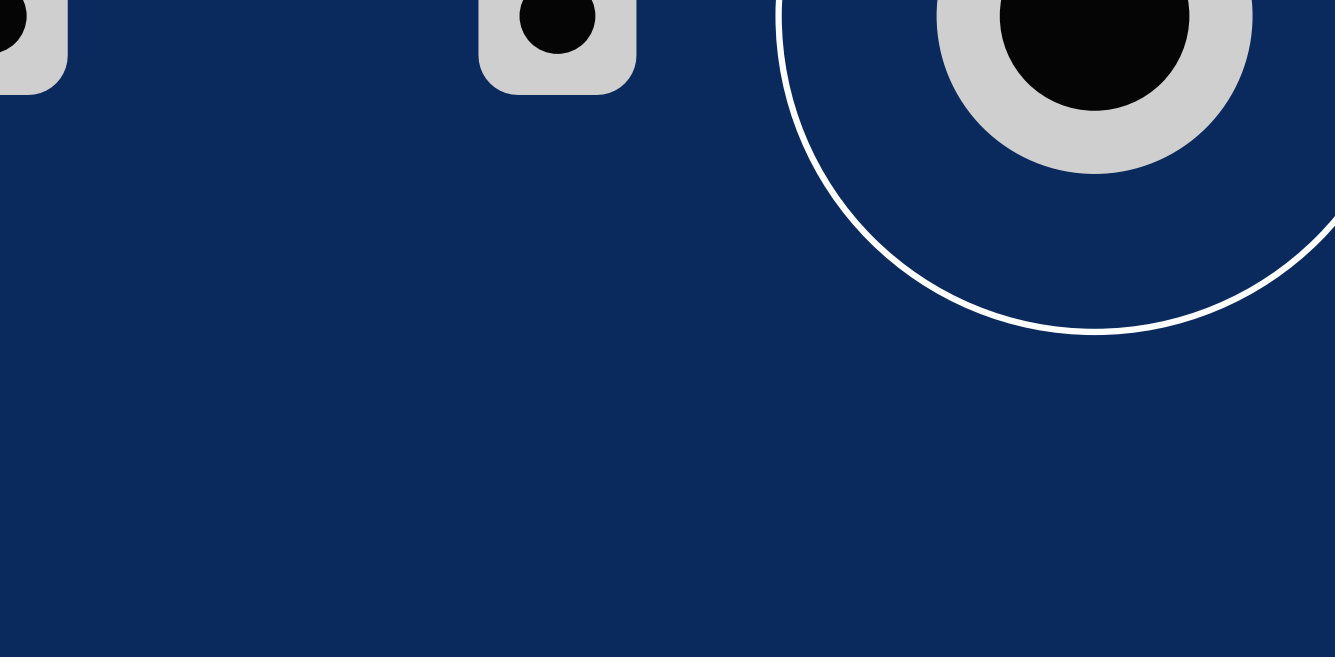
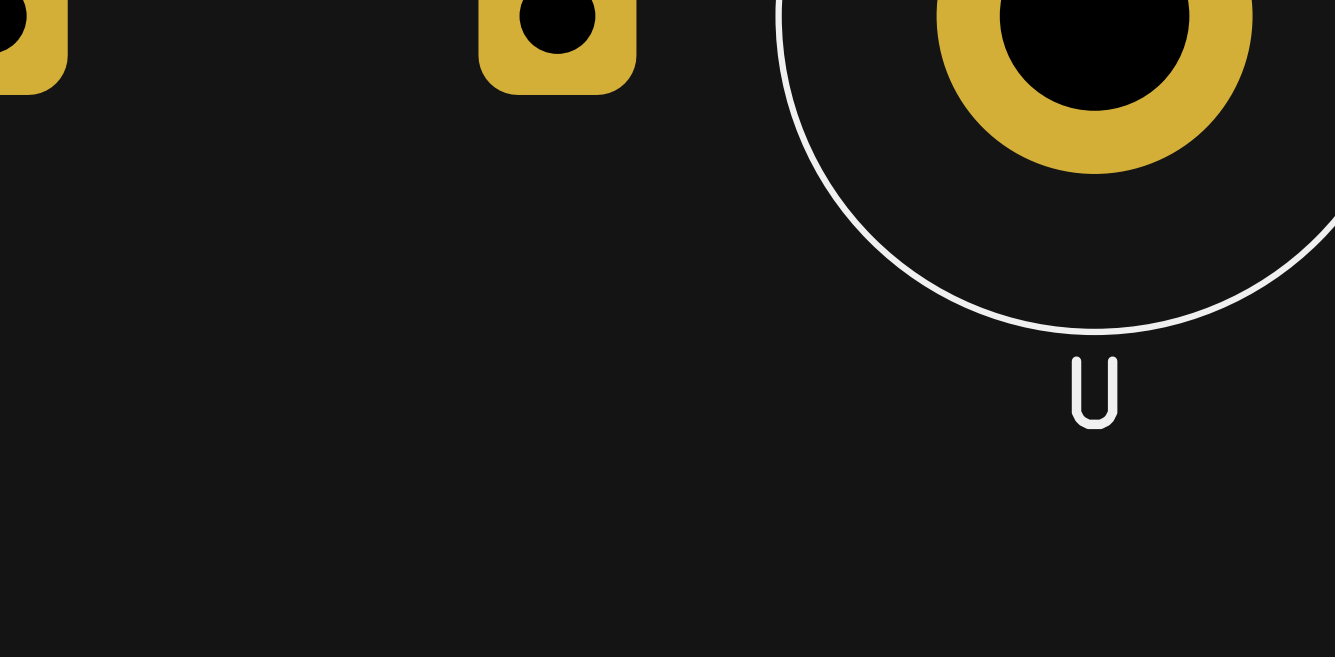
part value: none -> U (1094, 392)

